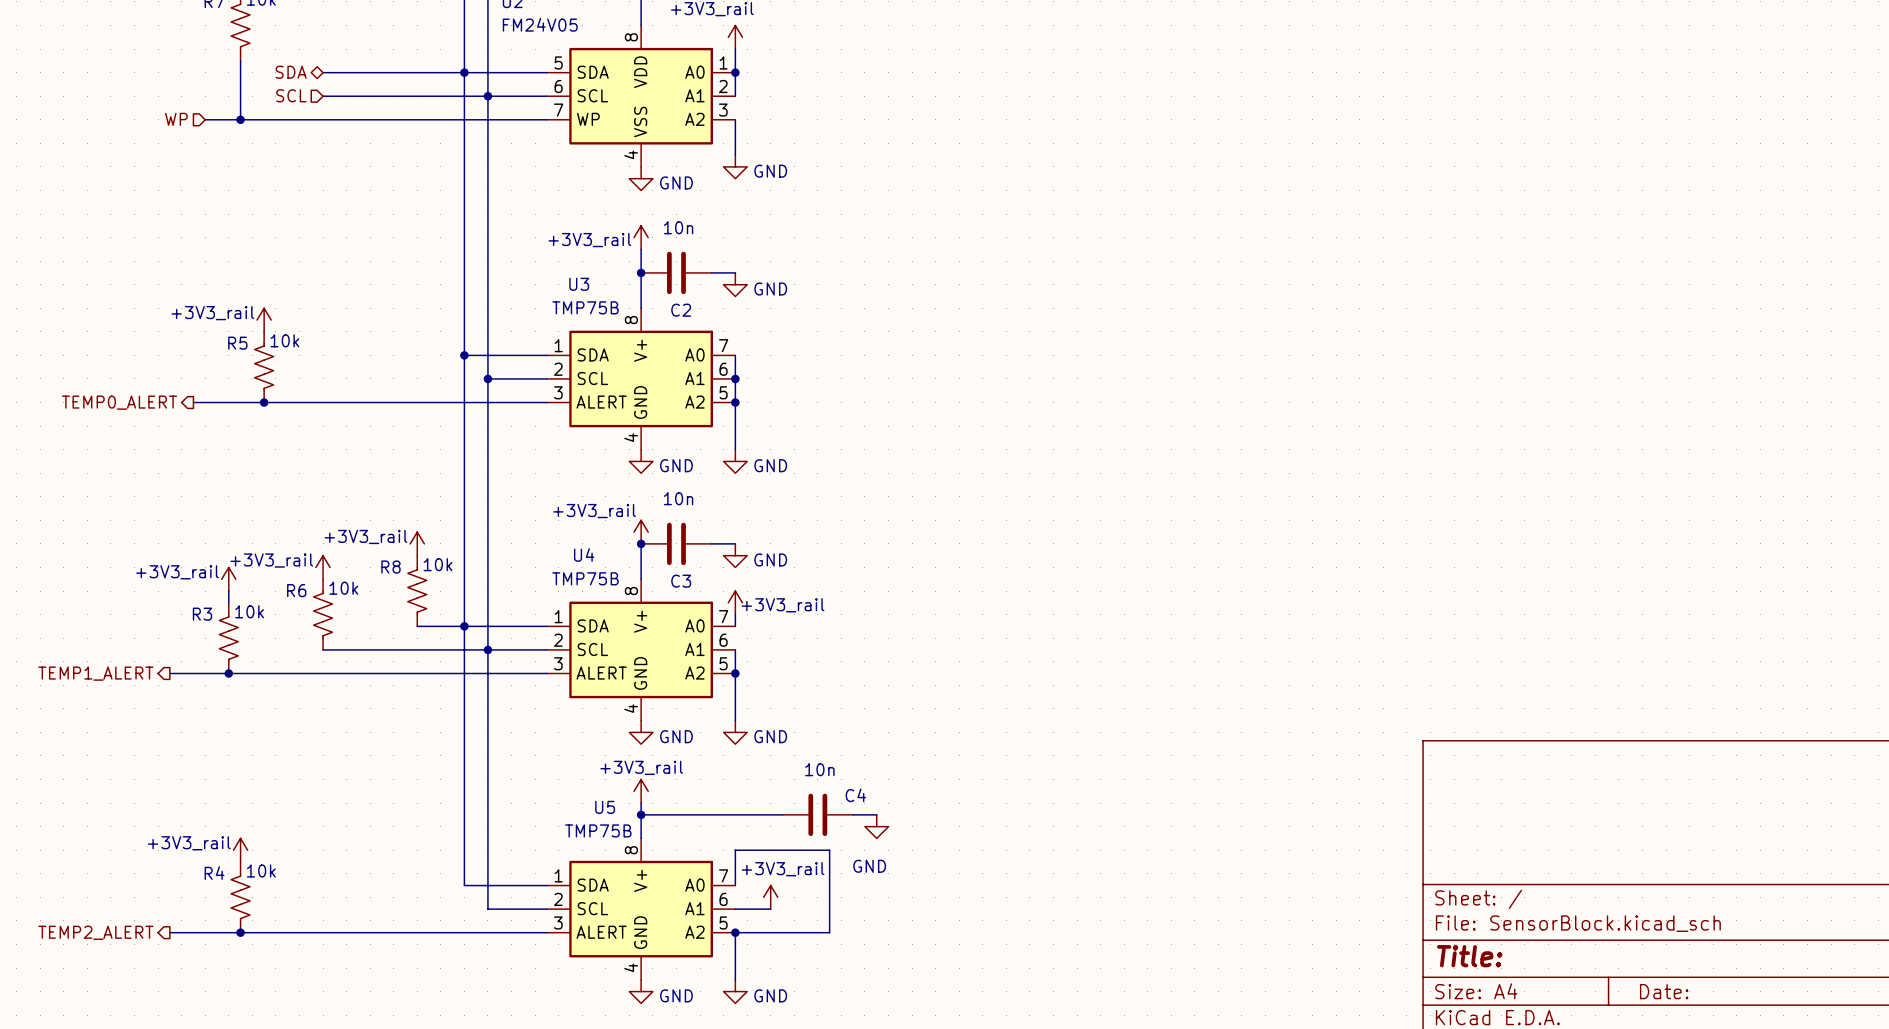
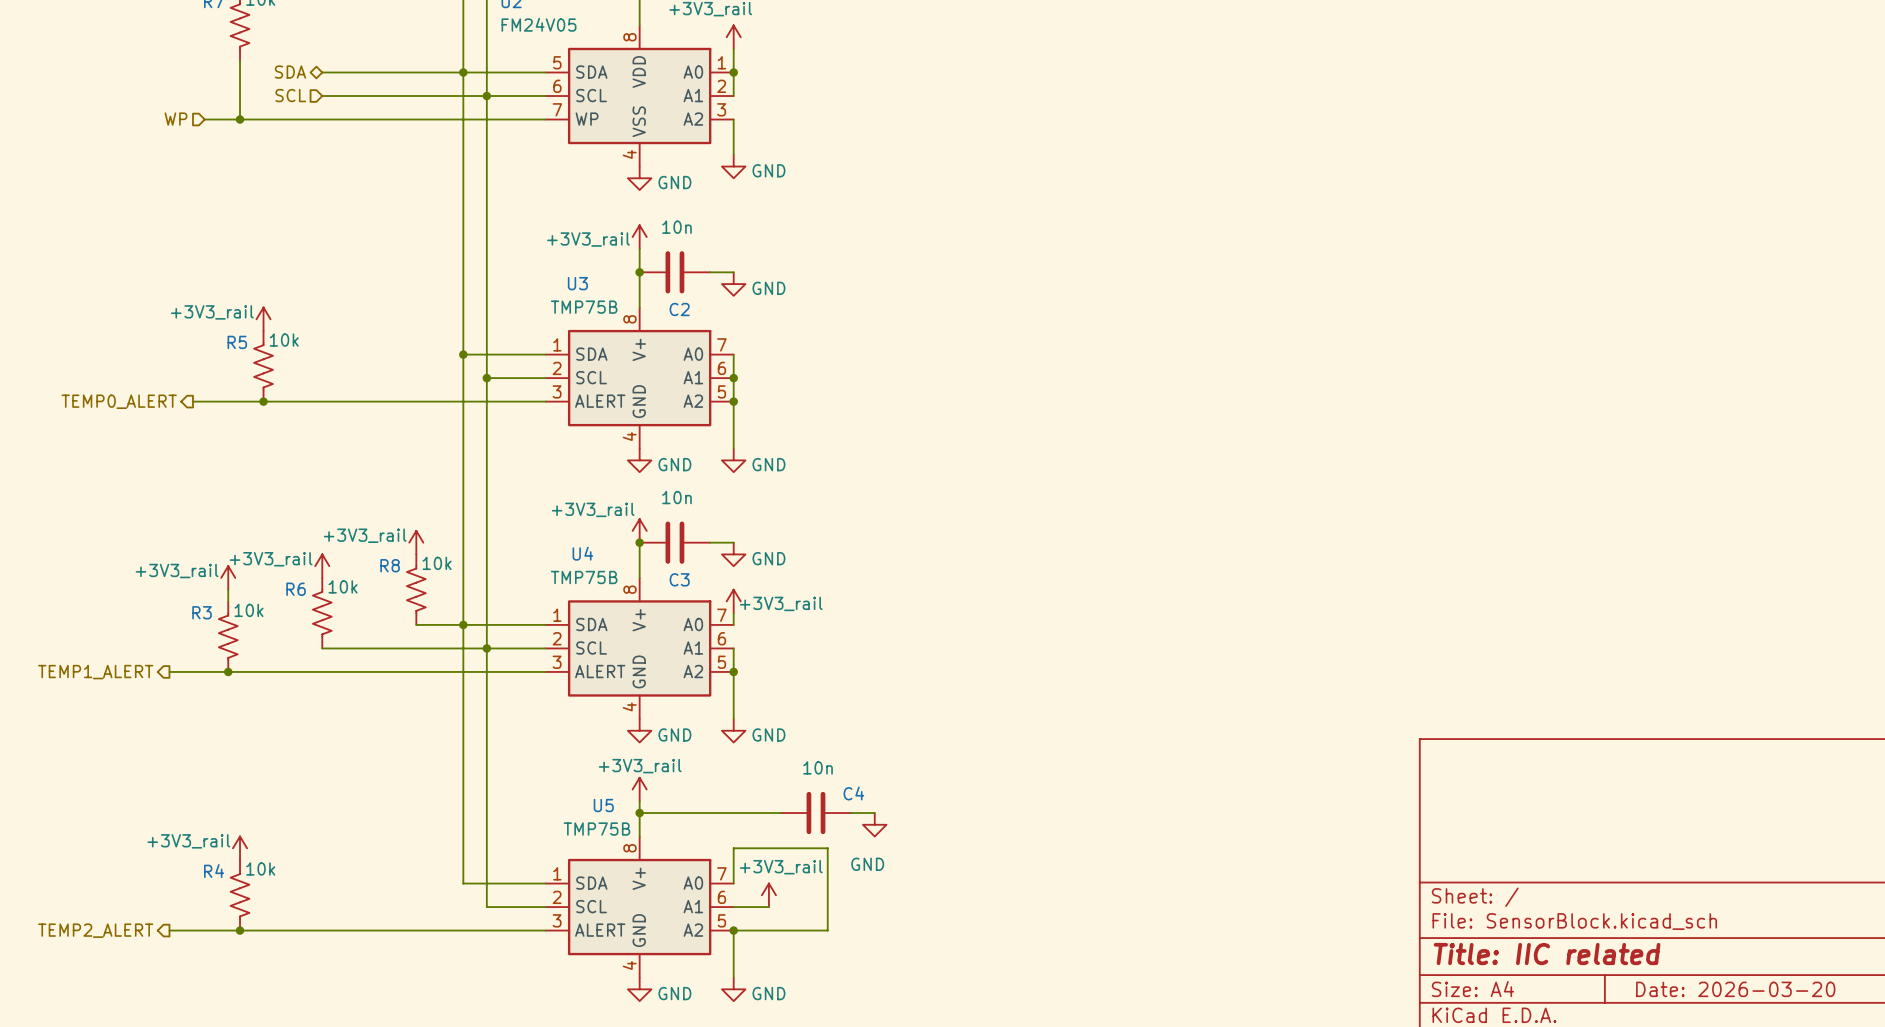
title block: Title: (1469, 956) -> Title: IIC related (1547, 954)
title block: Date: (1664, 991) -> Date: 2026-03-20 (1735, 989)

